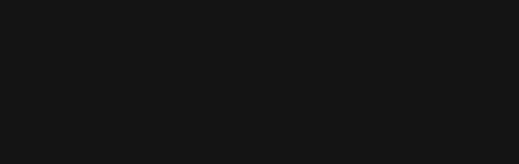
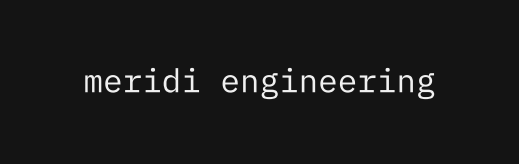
text: none -> meridi engineering (259, 83)

